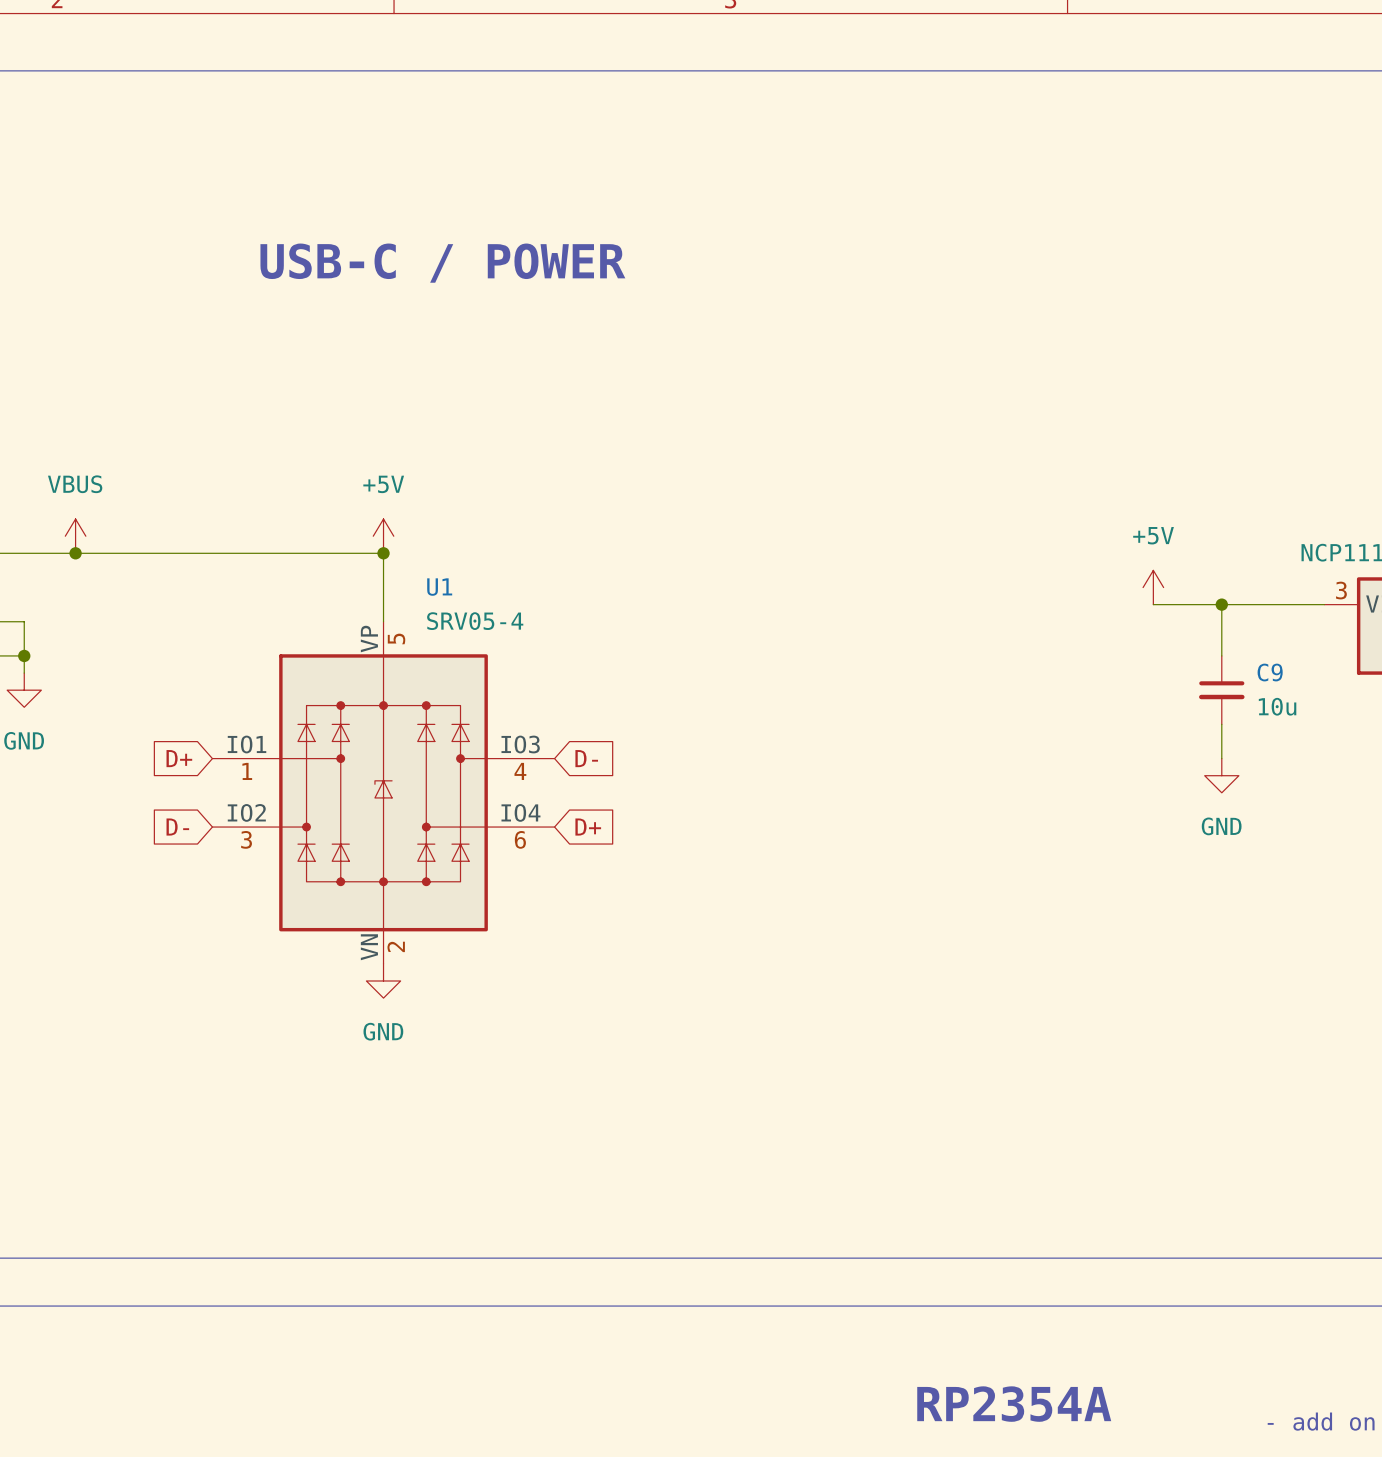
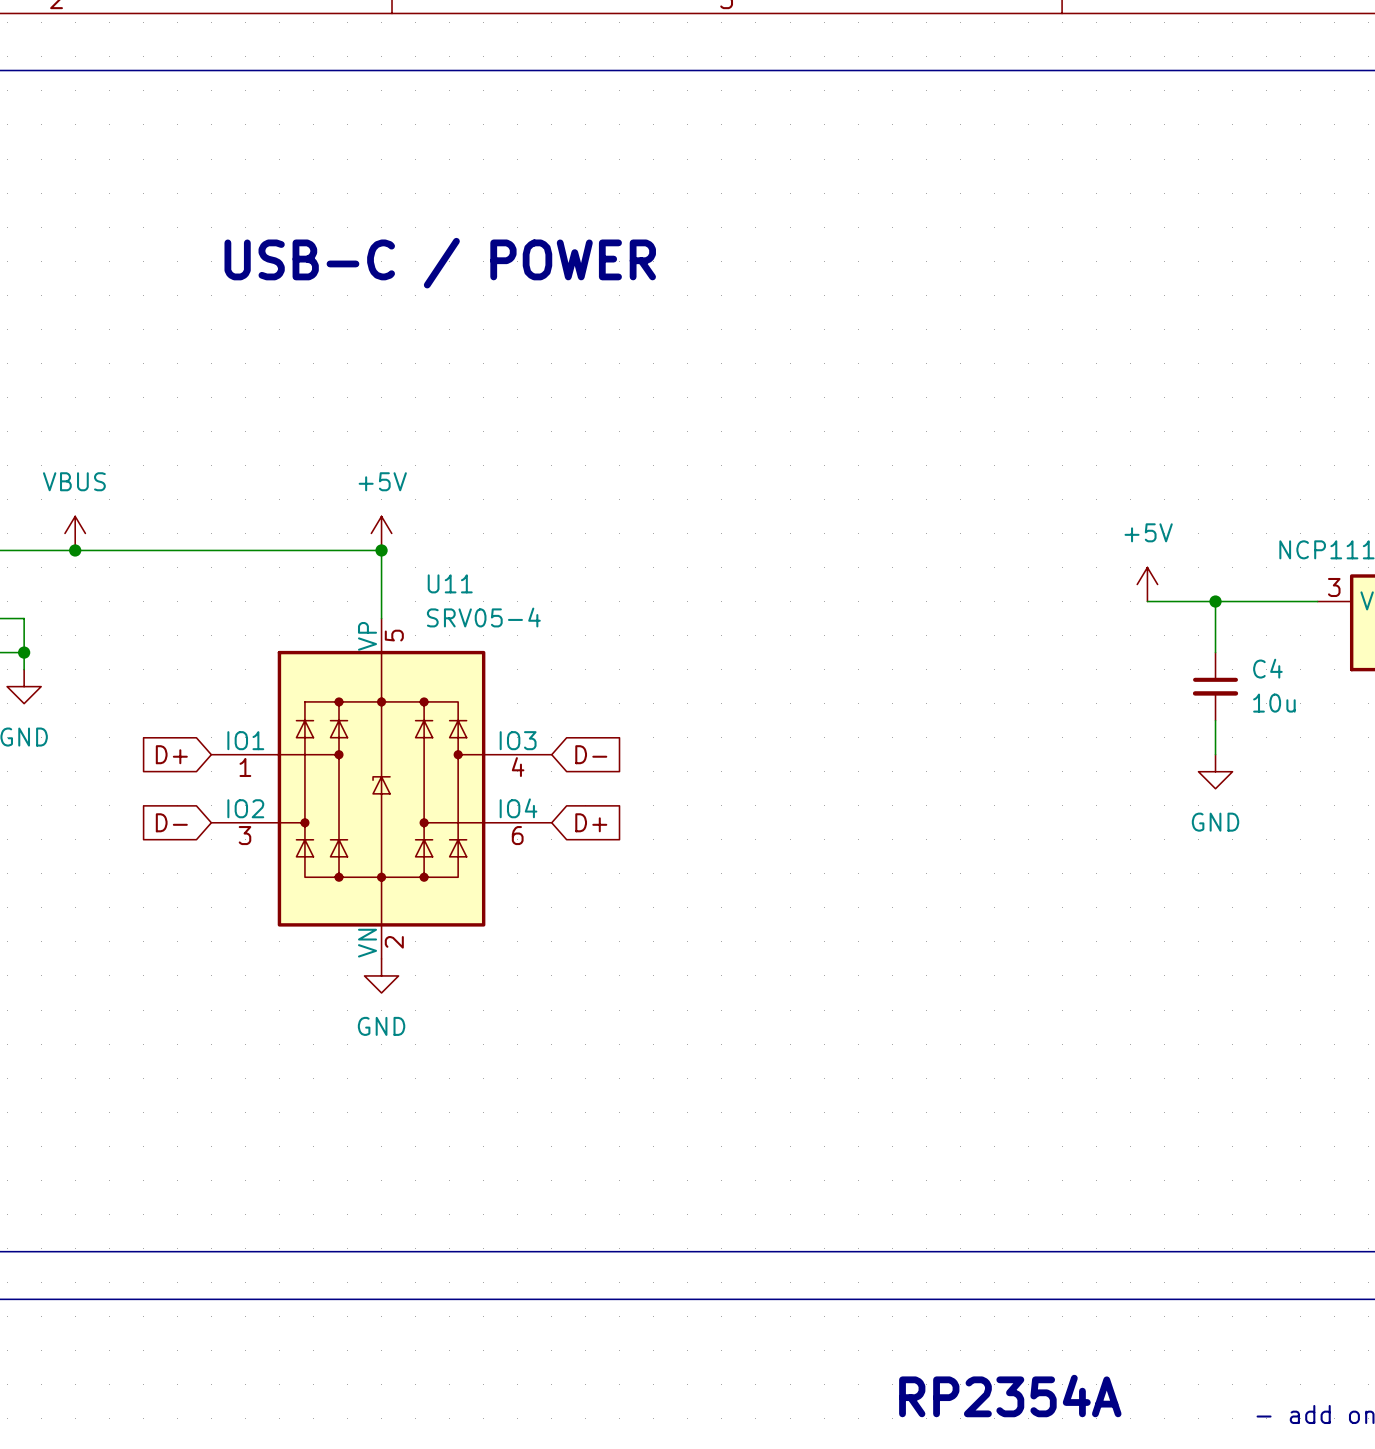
U1 name: U1 (439, 587) -> U11 (450, 583)
C9 name: C9 (1270, 672) -> C4 (1267, 668)

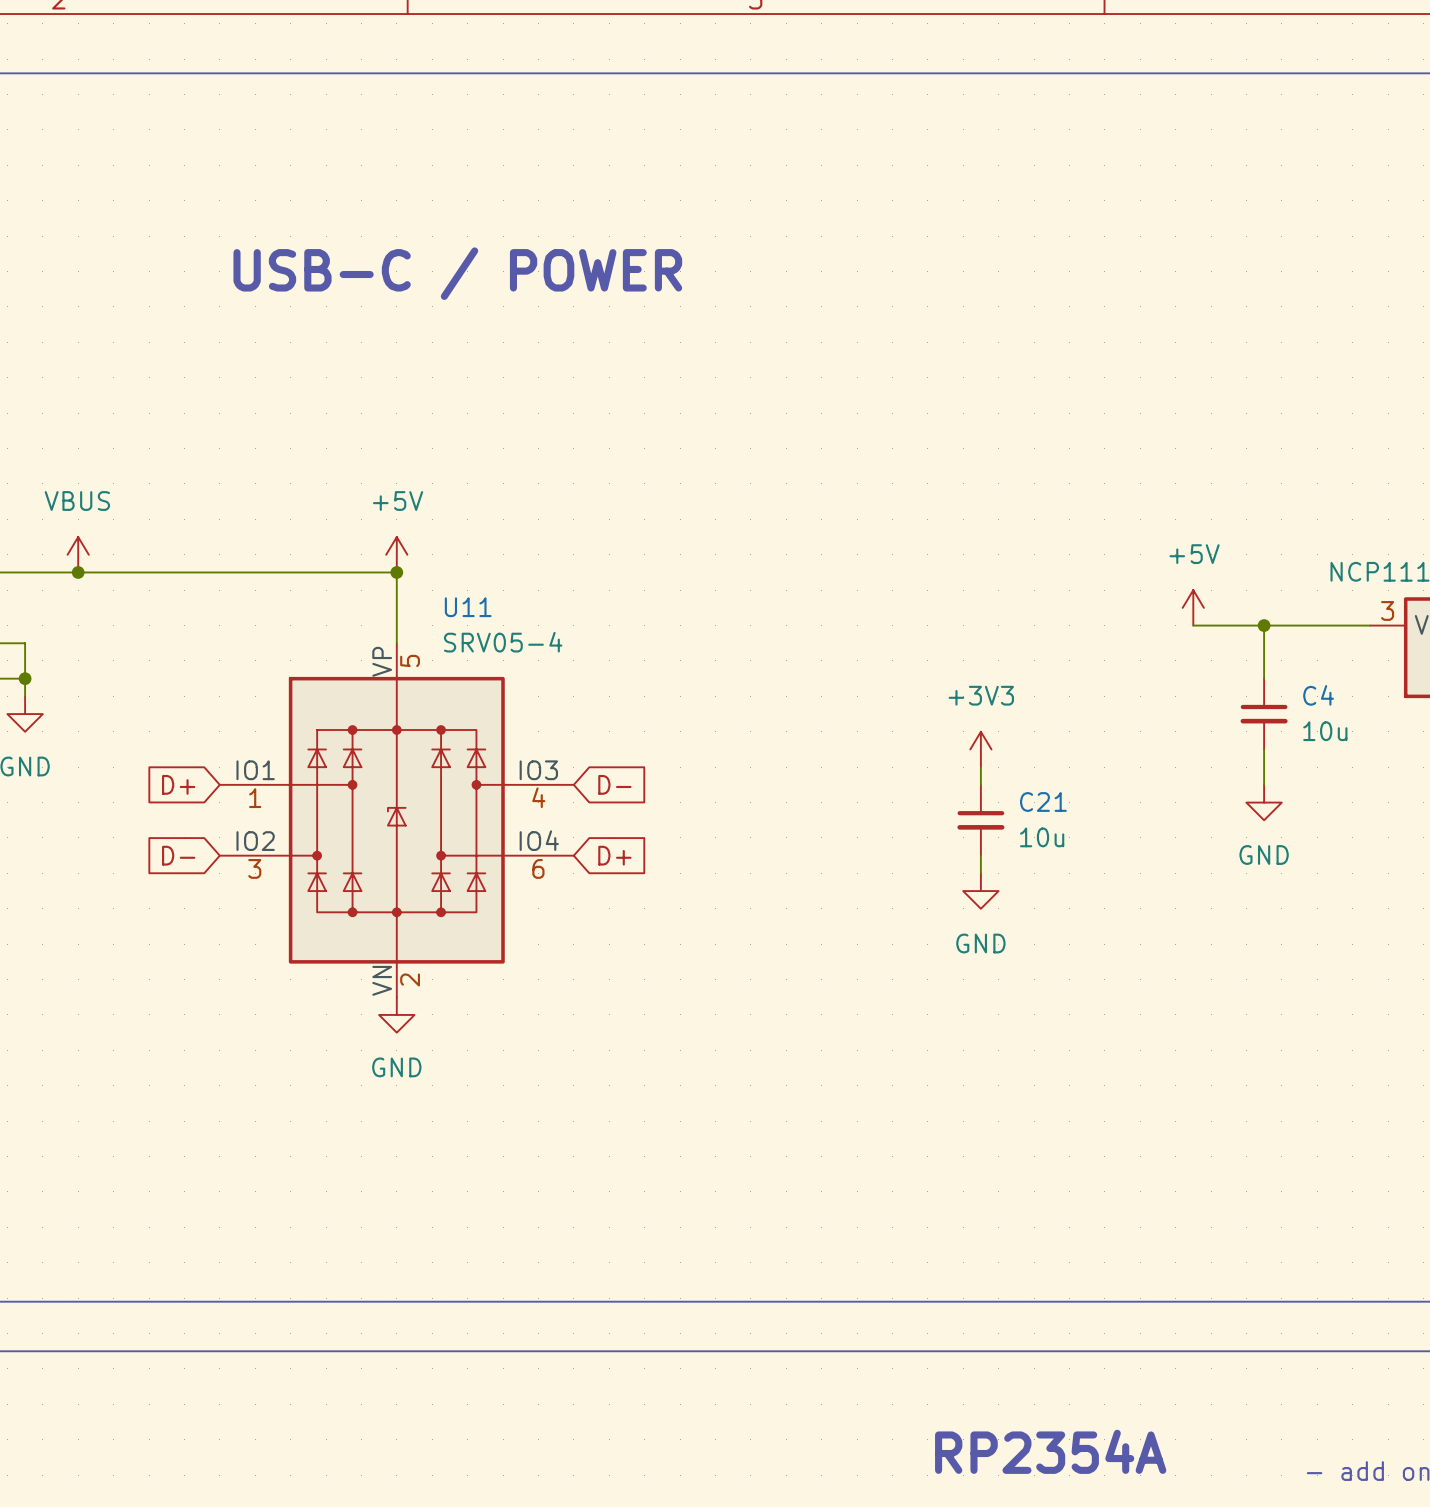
power symbol: none -> +3V3 (980, 749)
wire: none -> (980, 767) (980, 784)
C21: none -> 10u (980, 820)
wire: none -> (980, 855) (980, 873)
power symbol: none -> GND (980, 891)

